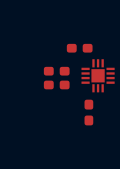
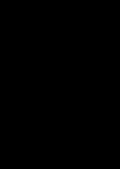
part: (79, 48) -> none
part: (56, 71) -> none
part: (98, 75) -> none
part: (56, 84) -> none
part: (88, 112) -> none

